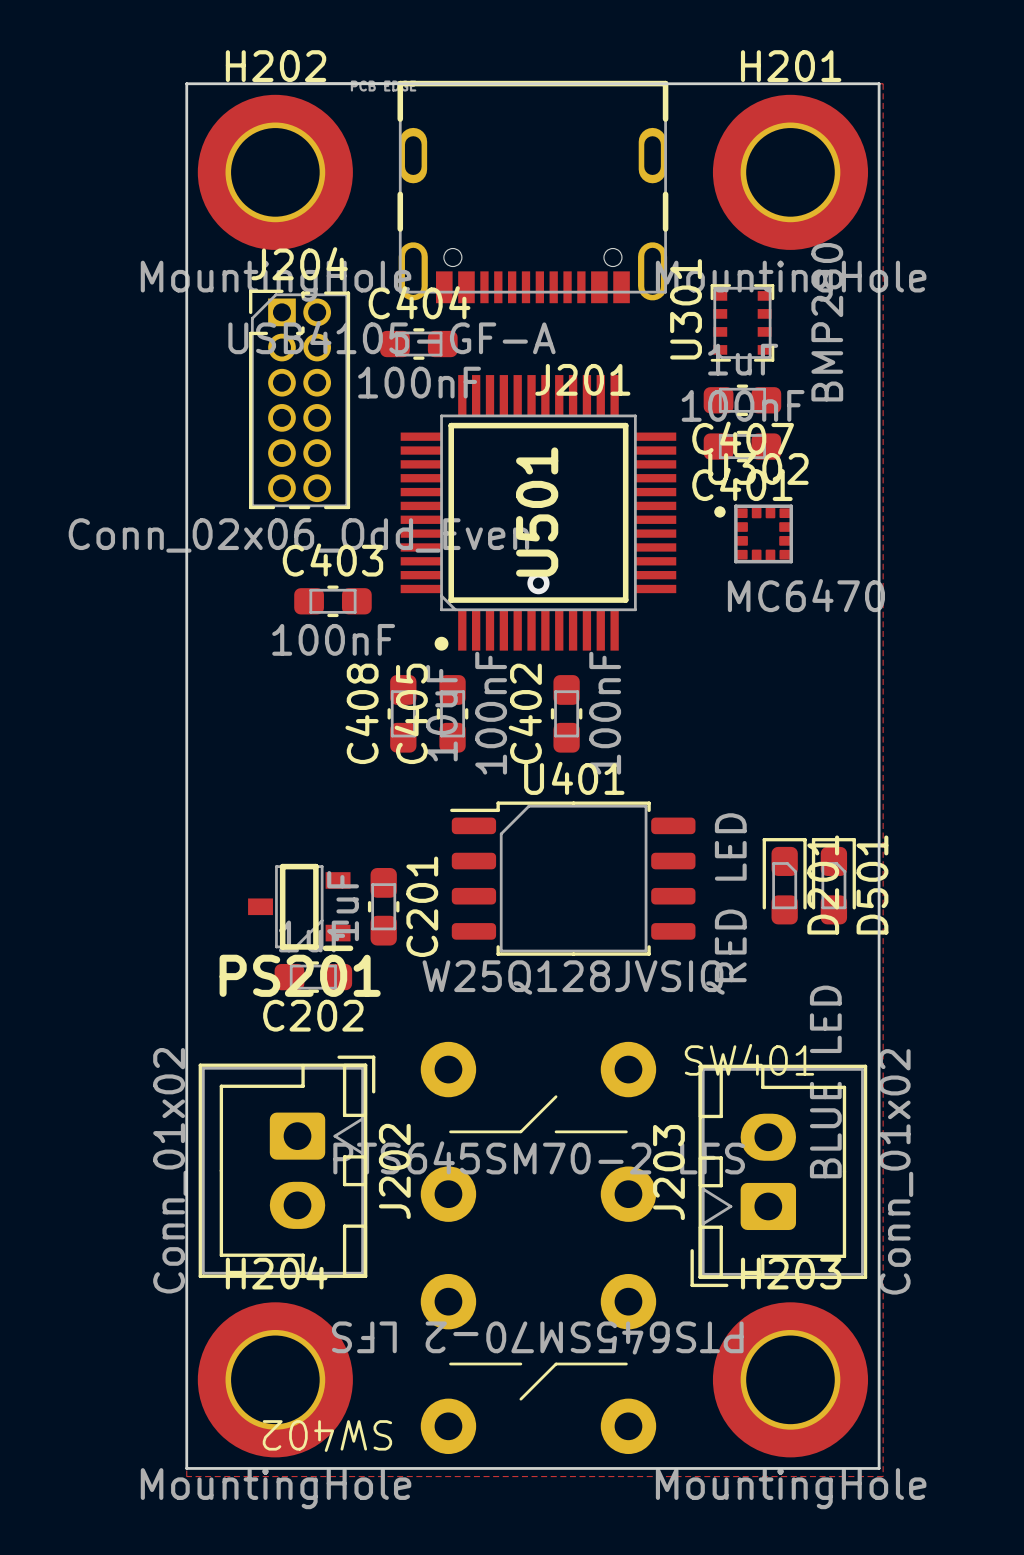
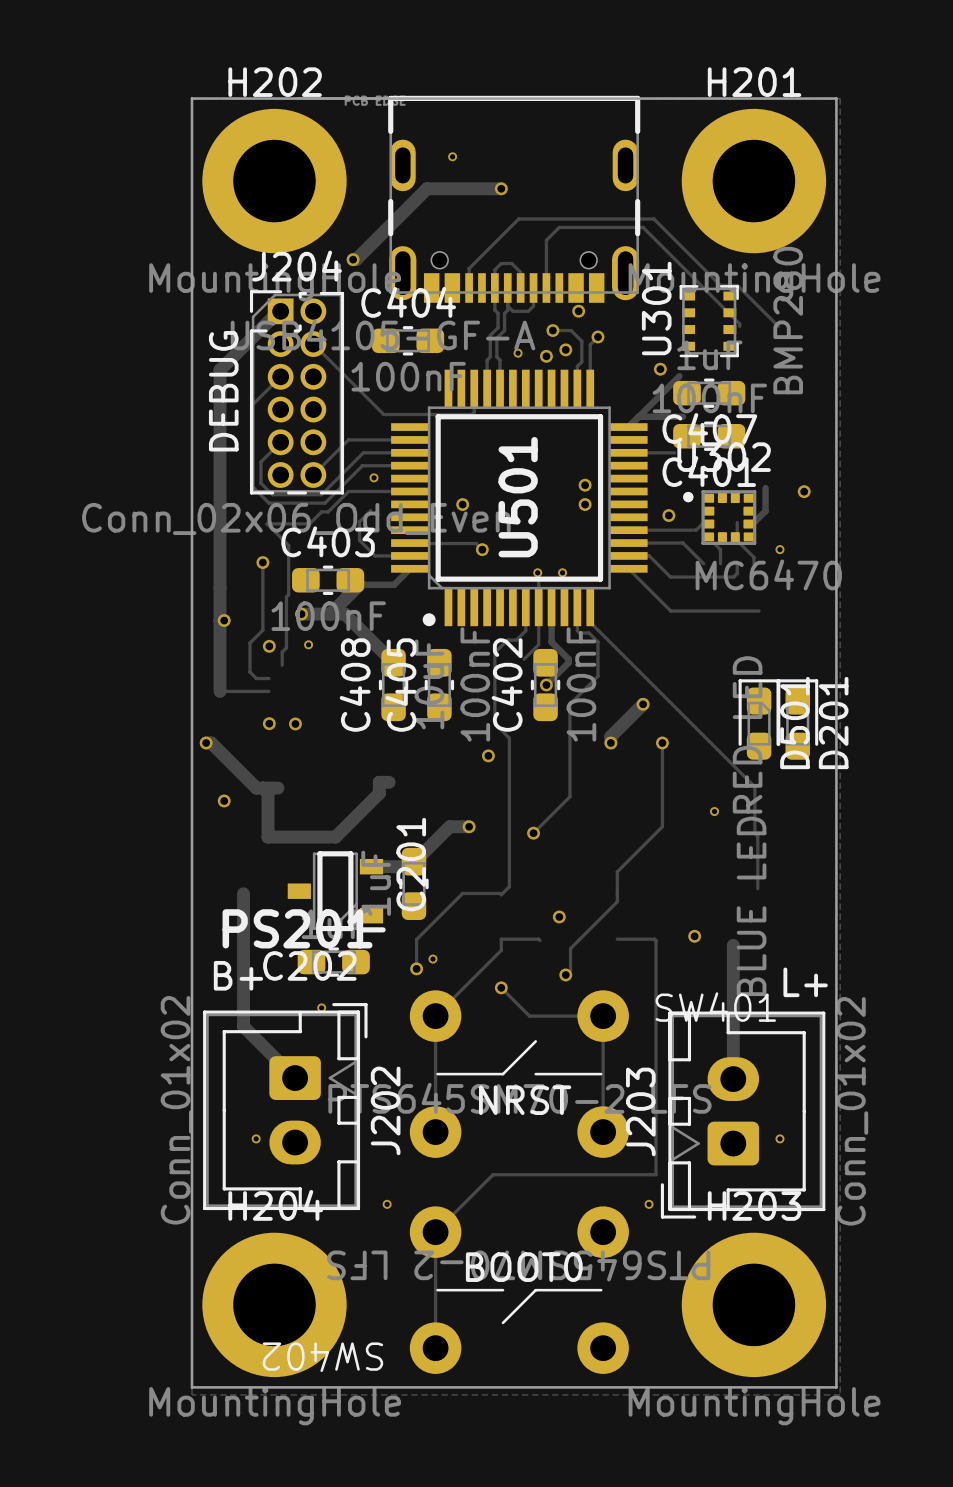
via: none -> (452, 156)
track: none -> (501, 188) (427, 188) (356, 259) (353, 259)
via: none -> (501, 188)
via: none -> (353, 259)
track: none -> (469, 287) (469, 268) (518, 219) (653, 219) (720, 285) (737, 285) (778, 326)
track: none -> (507, 287) (507, 310) (504, 313) (504, 330) (496, 338) (496, 357) (500, 360) (500, 388)
track: none -> (520, 287) (520, 272) (511, 263) (501, 263) (494, 269) (494, 310) (498, 313) (498, 327) (490, 335) (490, 357) (487, 360) (487, 388)
track: none -> (533, 287) (533, 306) (528, 311) (513, 311) (507, 306)
track: none -> (546, 287) (546, 240) (559, 227) (643, 227) (739, 324) (739, 326)
track: none -> (280, 311) (220, 370) (220, 691) (268, 691)
via: none -> (578, 311)
track: none -> (552, 330) (571, 330) (581, 341) (581, 361) (577, 366) (577, 388)
via: none -> (552, 330)
track: none -> (597, 336) (590, 344) (590, 388)
via: none -> (597, 336)
track: none -> (313, 344) (383, 414) (472, 414) (474, 412) (474, 388)
via: none -> (565, 349)
via: none -> (518, 353)
via: none -> (546, 356)
via: none -> (660, 369)
J201 name: J201 (582, 379) -> none
track: none -> (679, 376) (628, 427)
track: none -> (280, 376) (252, 404) (252, 486) (269, 503) (325, 503) (362, 465) (410, 465)
text: none -> DEBUG (223, 391)
track: none -> (638, 416) (683, 416)
track: none -> (410, 439) (348, 439) (313, 475)
track: none -> (280, 442) (260, 461) (260, 483) (272, 494) (321, 494) (363, 452) (410, 452)
track: none -> (628, 452) (674, 452)
via: none -> (374, 477)
via: none -> (585, 485)
track: none -> (765, 488) (765, 511) (754, 522)
track: none -> (410, 491) (348, 491) (328, 511) (321, 511) (309, 523) (267, 523) (288, 545) (286, 647) (282, 652) (282, 665)
via: none -> (804, 491)
via: none -> (462, 504)
via: none -> (585, 504)
track: none -> (370, 510) (359, 521) (359, 540) (375, 555) (410, 555)
via: none -> (668, 515)
track: none -> (703, 522) (696, 530) (628, 530)
track: none -> (737, 522) (737, 540) (754, 557) (754, 563)
track: none -> (410, 543) (476, 543) (482, 549)
track: none -> (628, 543) (682, 543) (703, 563)
track: none -> (713, 543) (720, 549) (720, 563)
via: none -> (482, 549)
via: none -> (779, 549)
track: none -> (628, 555) (649, 555) (670, 577) (733, 577) (737, 573) (737, 563)
track: none -> (262, 562) (262, 630) (249, 643) (249, 672) (256, 678) (268, 678)
via: none -> (262, 562)
via: (538, 583) -> none
track: none -> (410, 568) (394, 584) (359, 584) (330, 614)
track: none -> (628, 568) (670, 611) (759, 611)
track: none -> (537, 572) (538, 644) (524, 659)
via: none -> (537, 572)
via: none -> (562, 572)
track: none -> (525, 607) (525, 630) (516, 640) (507, 640) (494, 652) (494, 723) (509, 738) (509, 886) (501, 894) (462, 893) (416, 939) (416, 968)
track: none -> (551, 607) (551, 642) (568, 659) (568, 662) (546, 684)
track: none -> (577, 607) (577, 630) (579, 632) (588, 632) (597, 641) (597, 676) (569, 704) (569, 796) (533, 833)
track: none -> (590, 607) (590, 622) (754, 786) (757, 888)
track: none -> (301, 614) (344, 614) (393, 662)
via: none -> (301, 614)
via: none -> (224, 620)
via: none -> (308, 644)
via: none -> (269, 646)
via: none -> (546, 684)
track: none -> (643, 704) (610, 736) (610, 742)
via: none -> (643, 704)
via: none -> (269, 723)
via: none -> (295, 723)
track: none -> (206, 742) (211, 742) (256, 788) (278, 788)
via: none -> (206, 742)
via: none -> (610, 742)
track: none -> (662, 742) (662, 826) (617, 871) (617, 901) (570, 948) (570, 970) (565, 974)
via: none -> (662, 742)
via: none -> (488, 755)
track: none -> (389, 782) (379, 782) (379, 793) (335, 837) (268, 837) (268, 793) (262, 788)
via: none -> (224, 800)
via: none -> (714, 811)
track: none -> (469, 826) (449, 826) (408, 866) (371, 866)
via: none -> (469, 826)
via: none -> (533, 833)
U401: W25Q128JVSIQ (572, 878) -> none
D201 position: (784, 881) -> (797, 719)
D501 position: (833, 881) -> (759, 719)
C201 position: (383, 906) -> (413, 883)
PS201 position: (300, 907) -> (336, 891)
track: none -> (243, 893) (243, 1026) (295, 1078)
via: none -> (559, 916)
C202 position: (313, 977) -> (333, 962)
via: none -> (694, 936)
track: none -> (617, 939) (655, 940) (655, 1174) (493, 1174) (435, 1232) (435, 1348)
track: none -> (539, 940) (501, 939) (501, 950) (435, 1016) (435, 1132)
track: none -> (733, 945) (733, 1079)
via: none -> (432, 959)
via: none -> (416, 968)
via: none -> (565, 974)
text: none -> B+ (238, 975)
text: none -> L+ (805, 982)
track: none -> (501, 987) (529, 1016) (603, 1016) (603, 1132)
via: none -> (501, 987)
via: none -> (321, 1007)
text: none -> NRST (525, 1100)
via: none -> (256, 1138)
via: none -> (779, 1138)
via: none -> (387, 1204)
via: none -> (649, 1204)
text: none -> BOOT0 (524, 1267)

